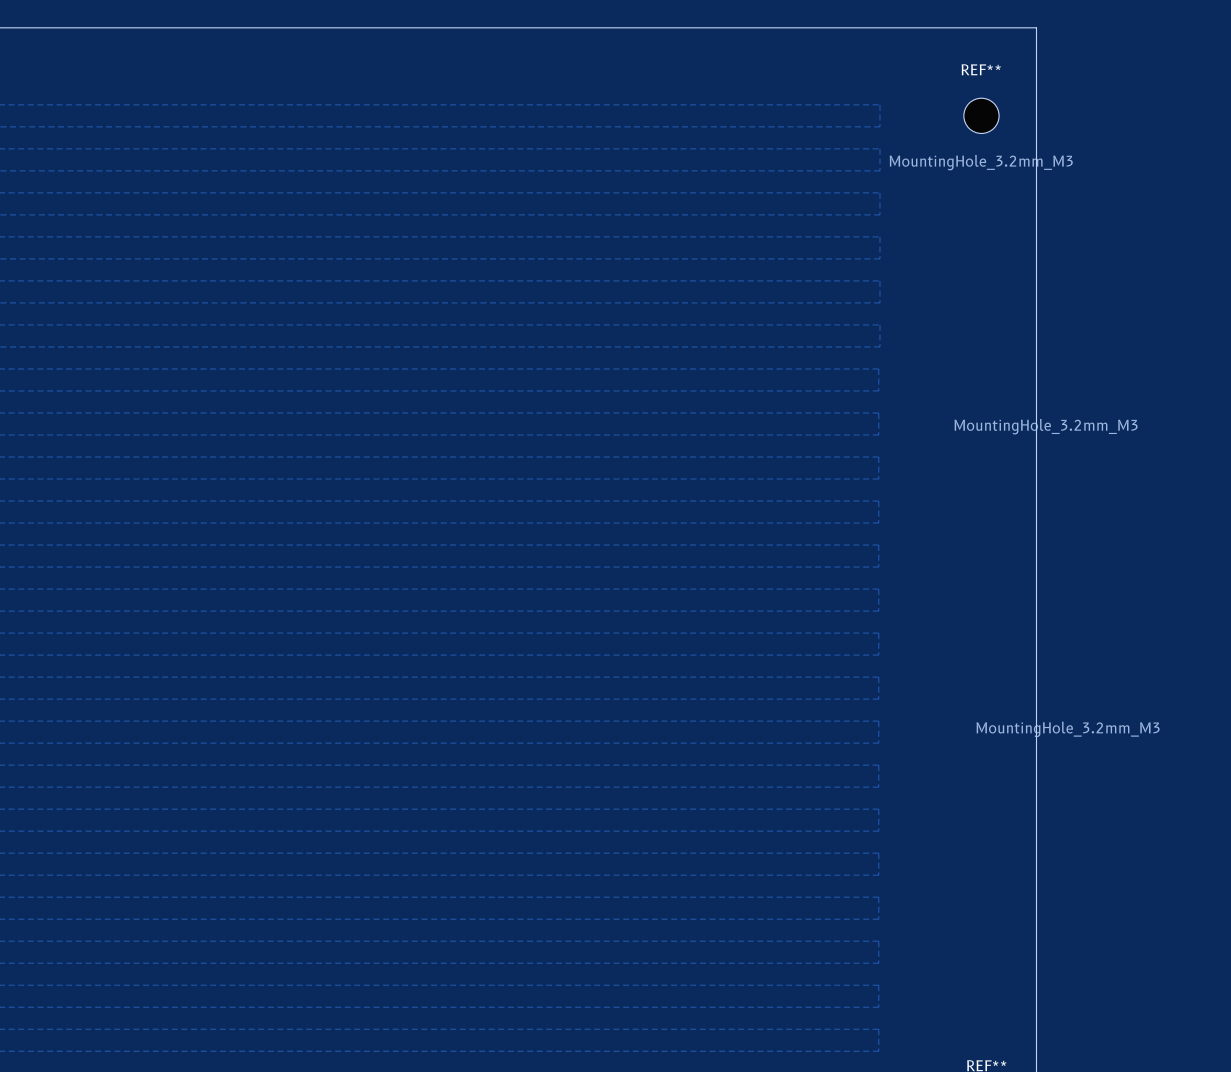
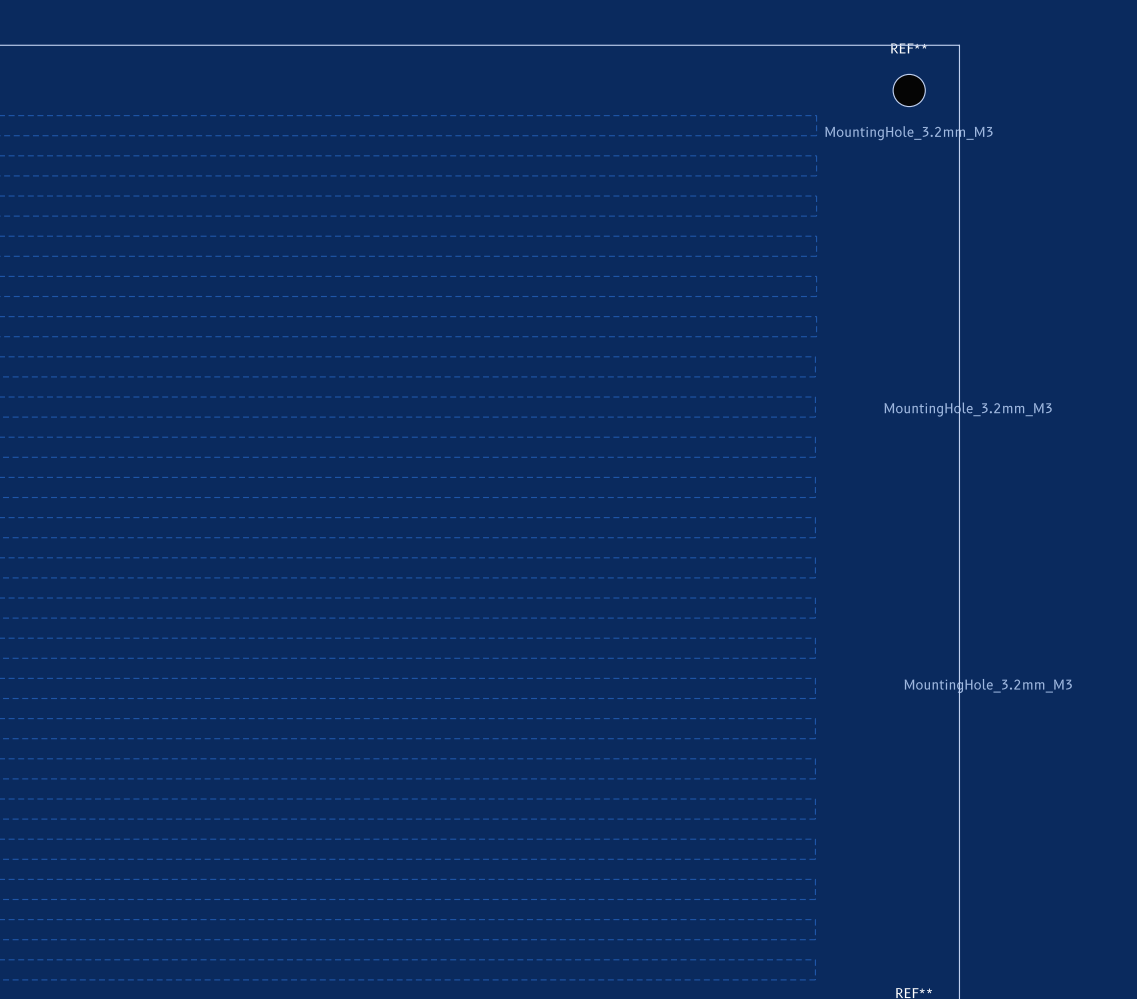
REF** position: (981, 115) -> (909, 90)

